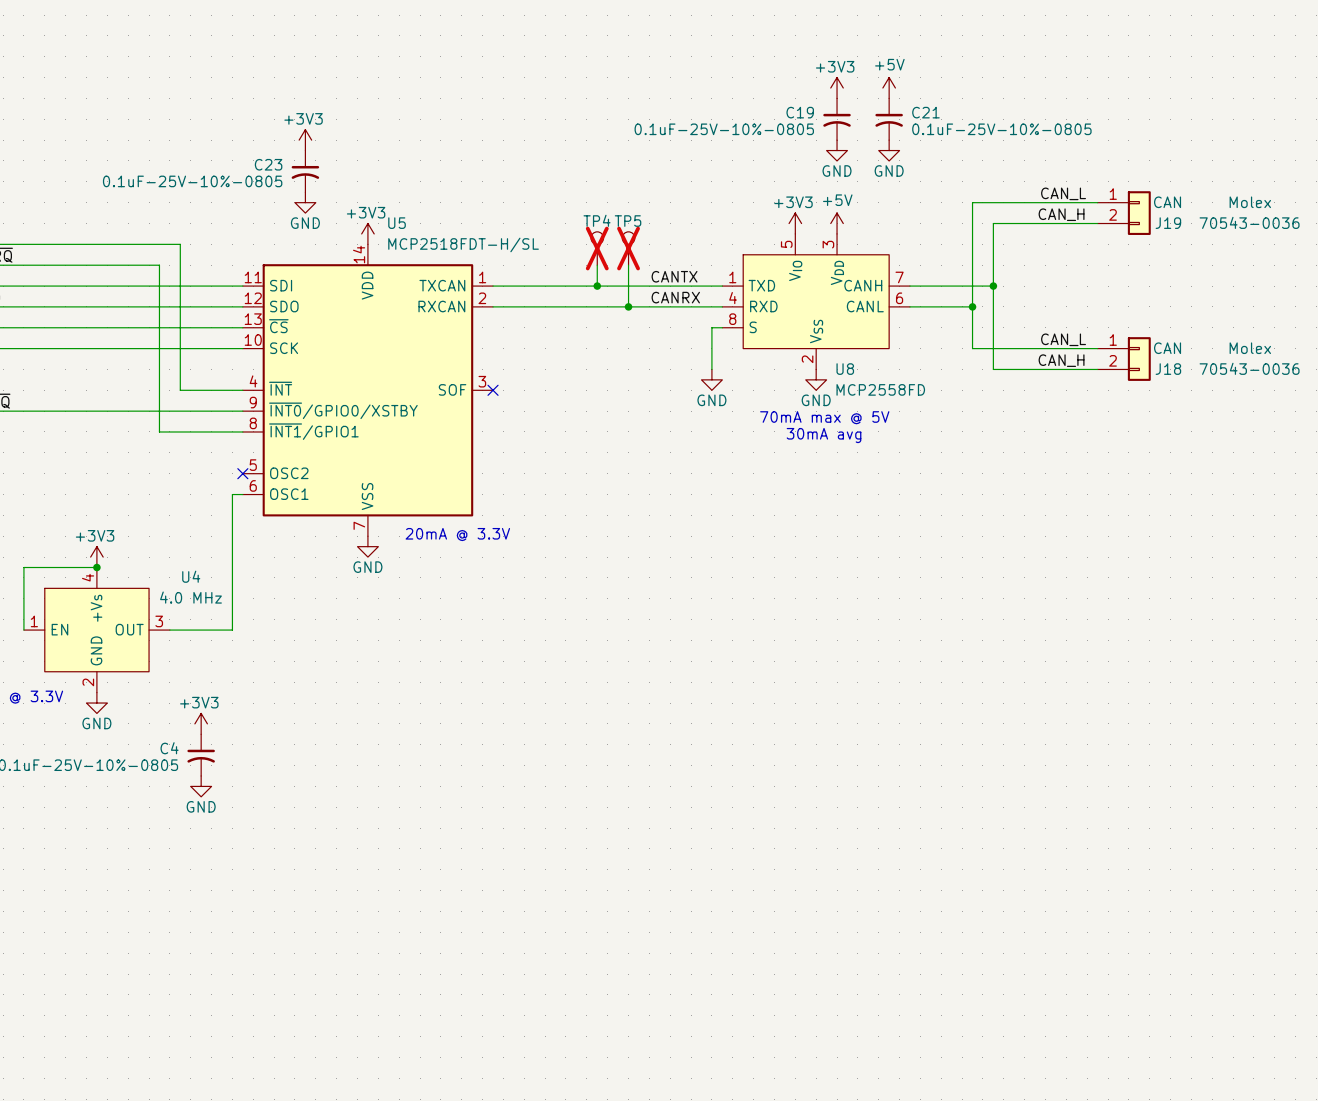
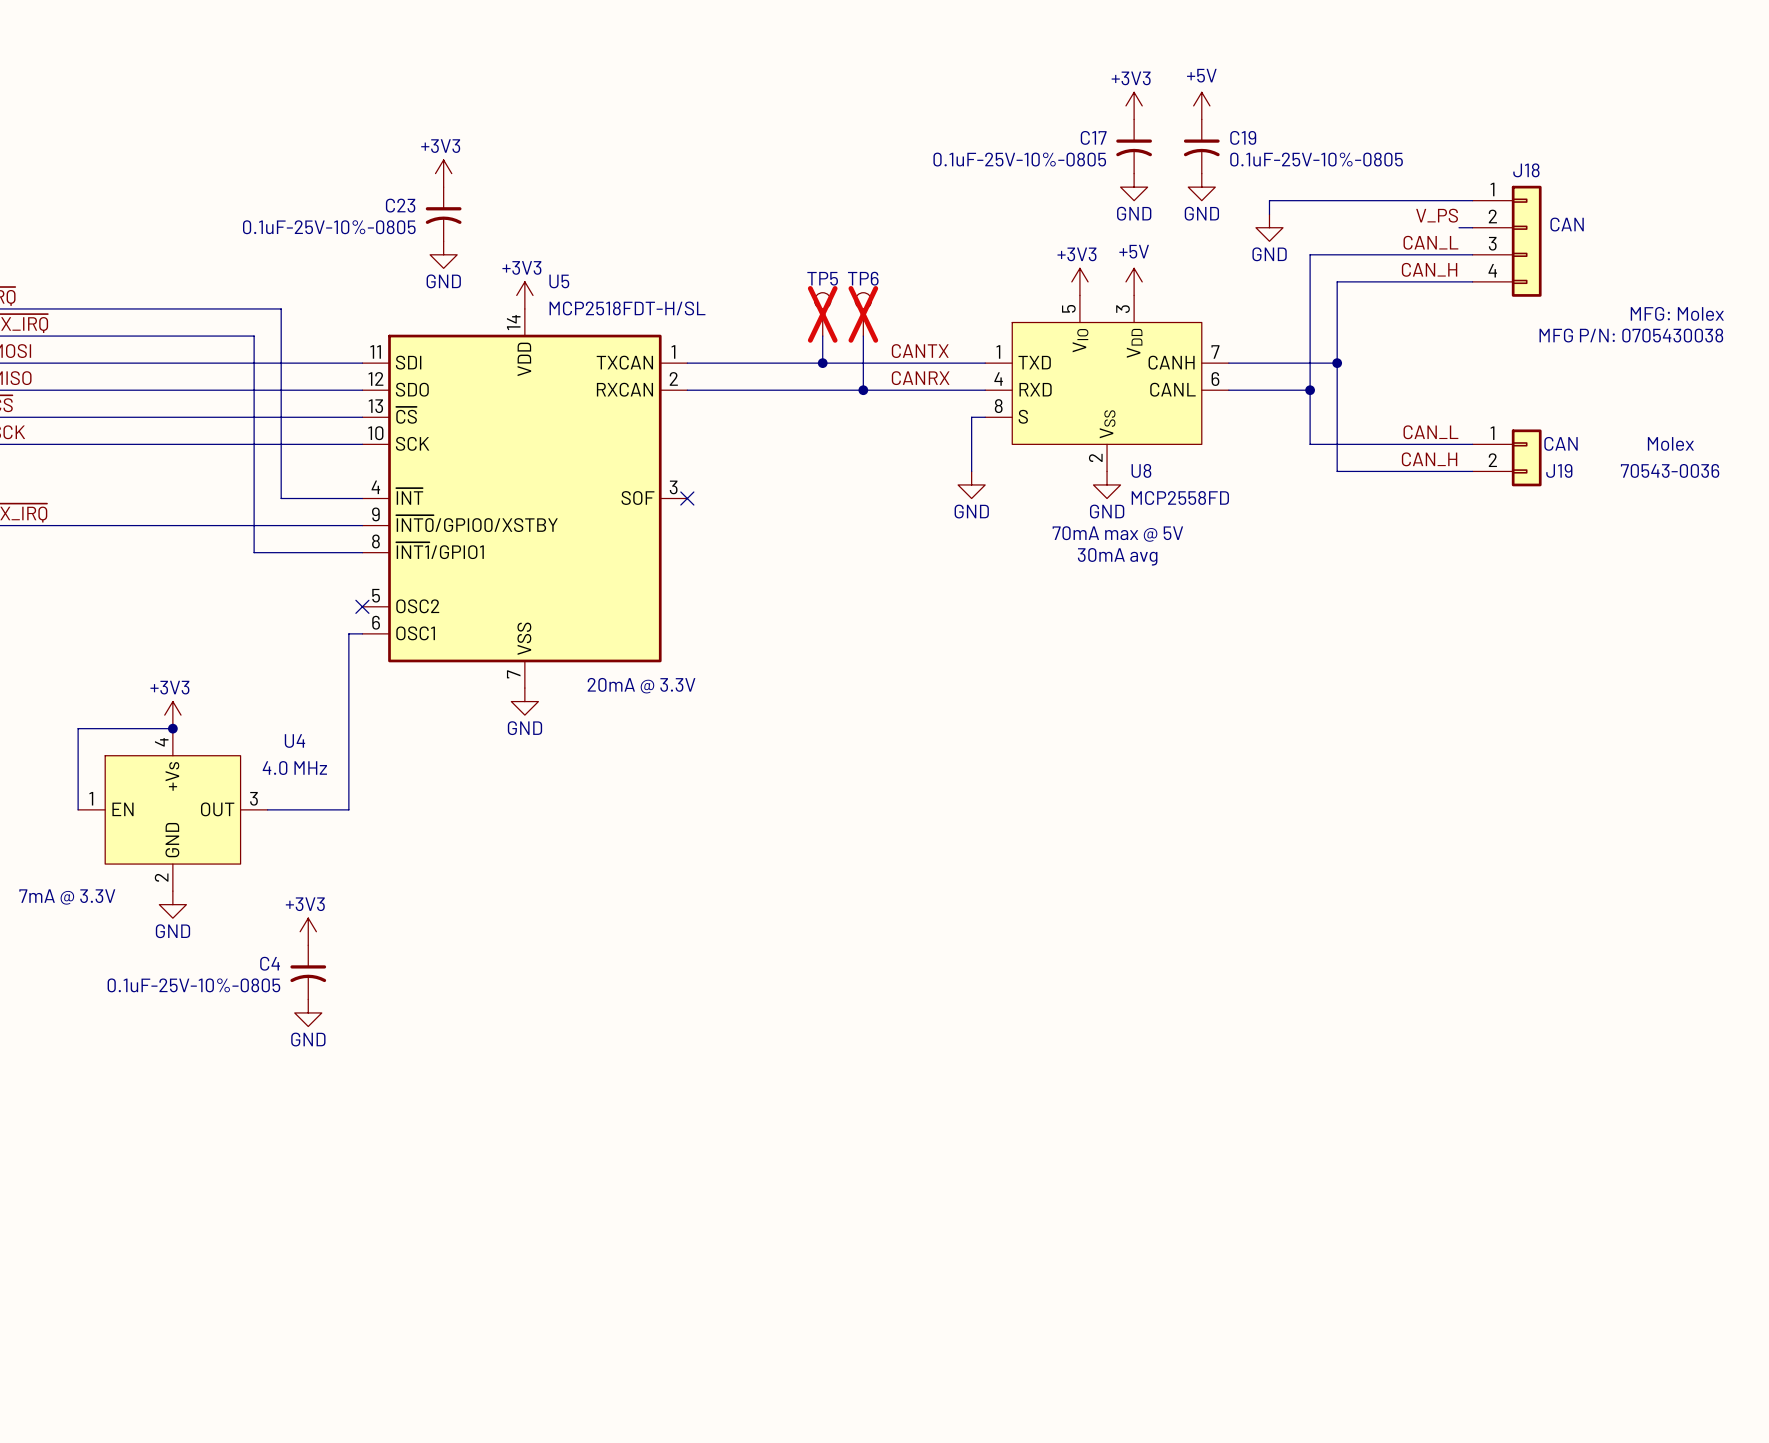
C19 name: C19 (800, 112) -> C17 (1093, 137)
C21 name: C21 (925, 112) -> C19 (1243, 137)
wire: none -> (1472, 200) (1269, 200) (1269, 214)
label: none -> V_PS (1437, 215)
power symbol: none -> GND (1269, 227)
wire: none -> (1459, 227) (1472, 227)
J18: none -> CAN (1507, 241)
J19: CAN (1124, 213) -> none
TP4 name: TP4 (597, 220) -> TP5 (822, 278)
TP5 name: TP5 (628, 221) -> TP6 (863, 278)
J18 name: J18 (1168, 369) -> J19 (1559, 470)

